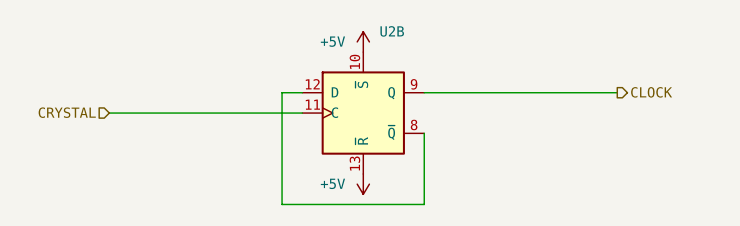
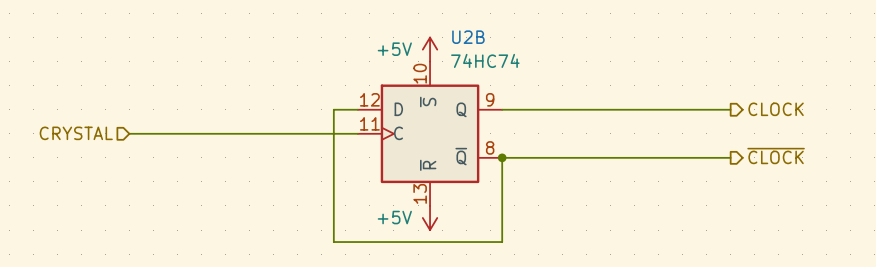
U2B value: none -> 74HC74 (485, 60)
hierarchical label: none -> ~{CLOCK} (776, 156)
wire: none -> (502, 157) (730, 157)
junction: none -> (502, 157)

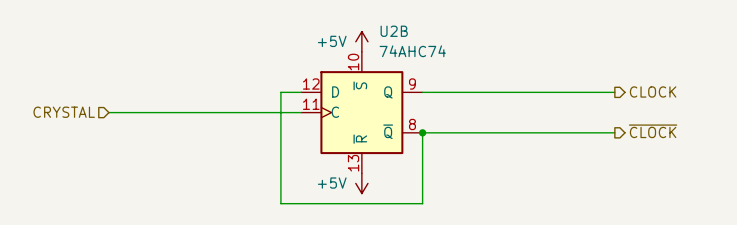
U2B value: 74HC74 (485, 60) -> 74AHC74 (412, 51)

